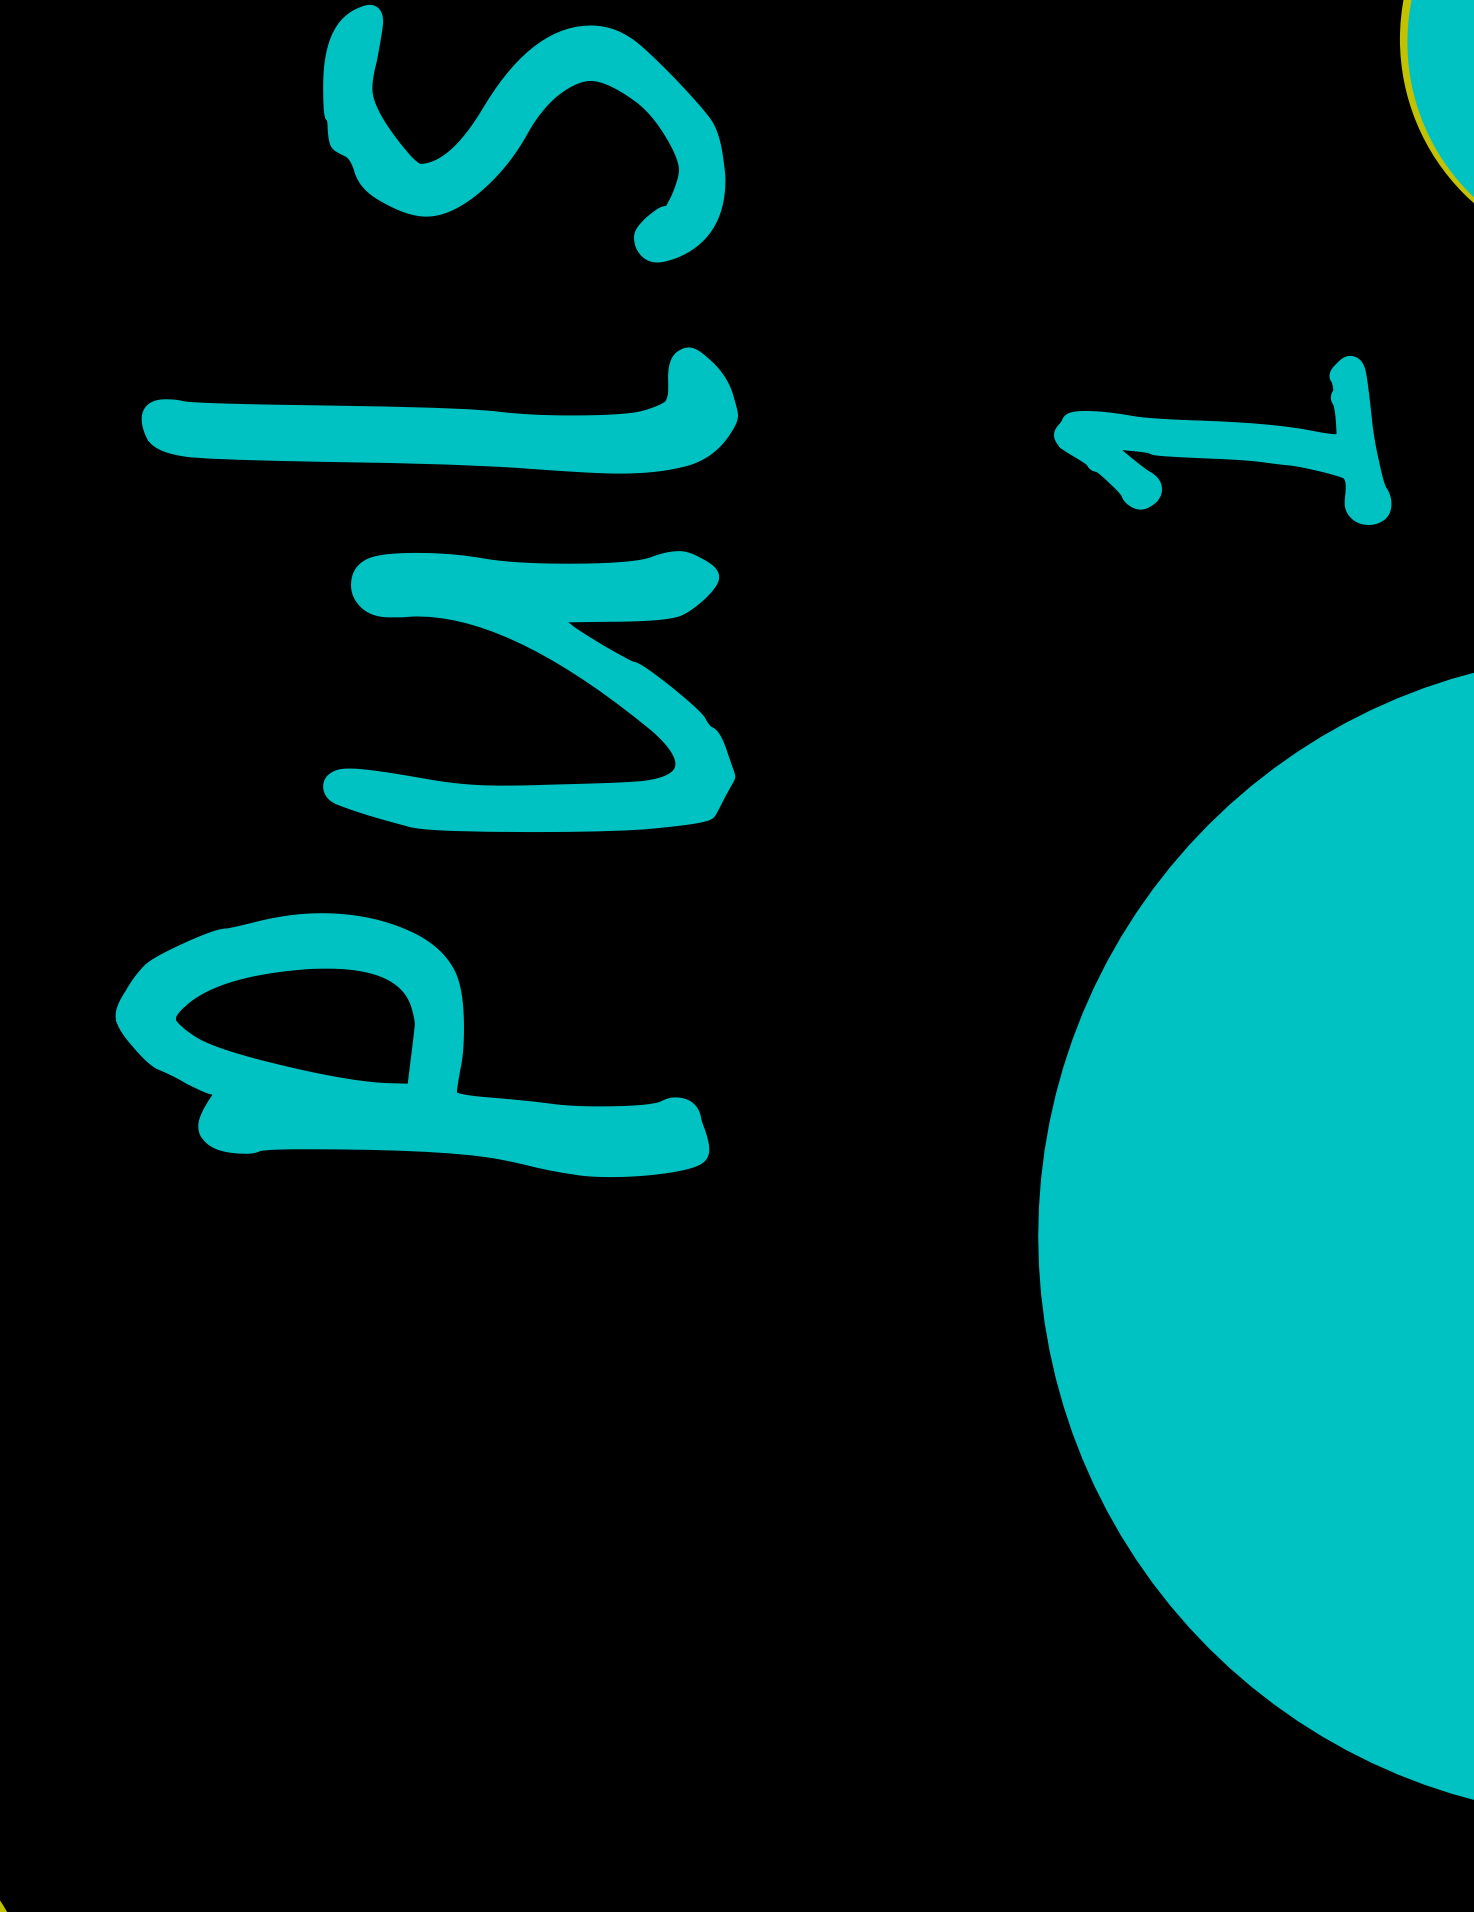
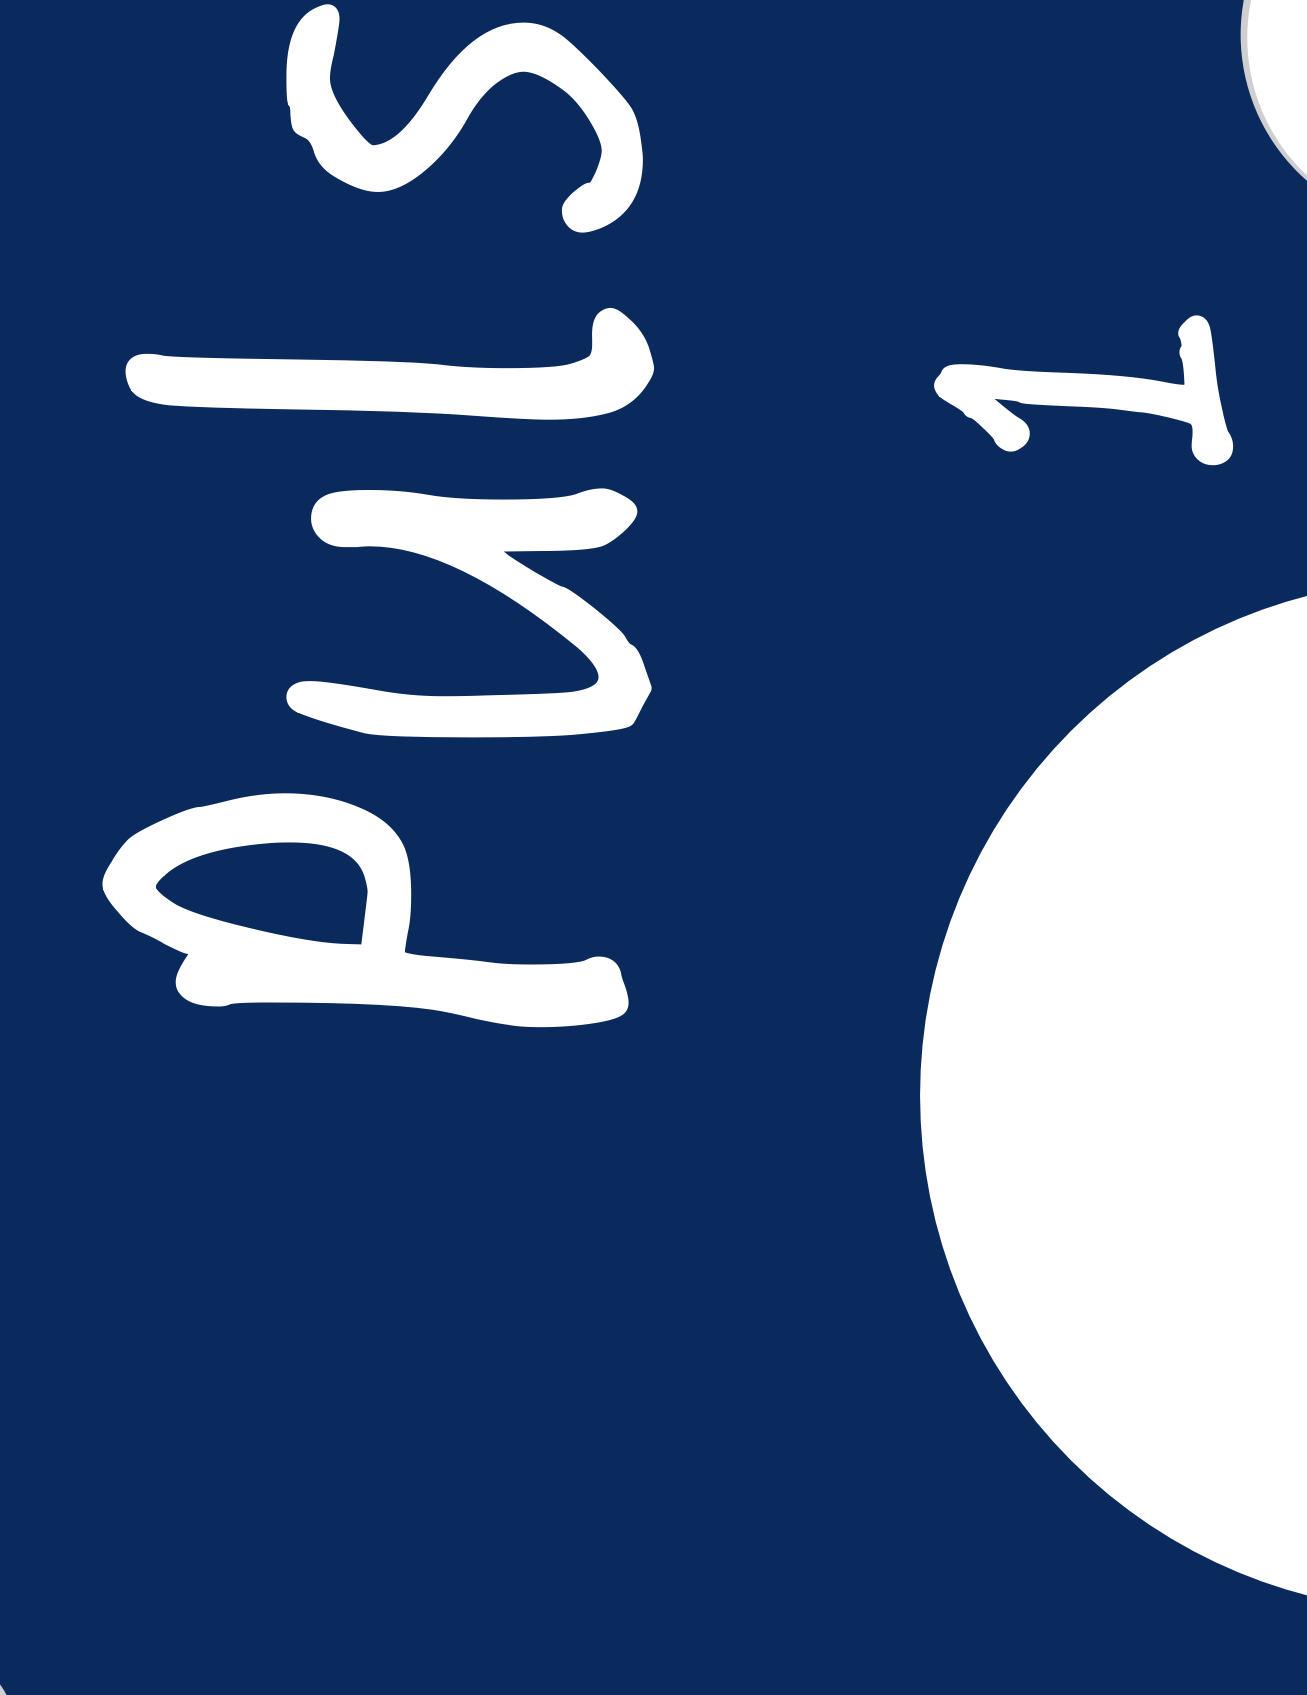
drawing position: (412, 1045) -> (365, 910)

